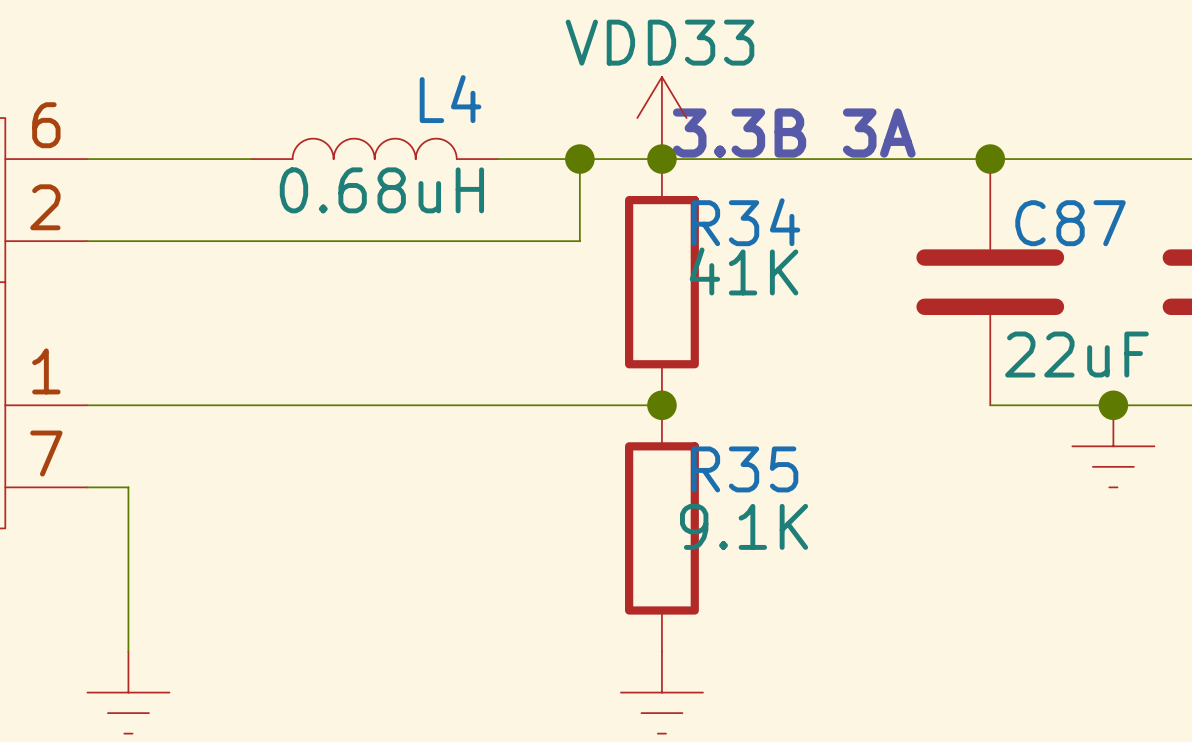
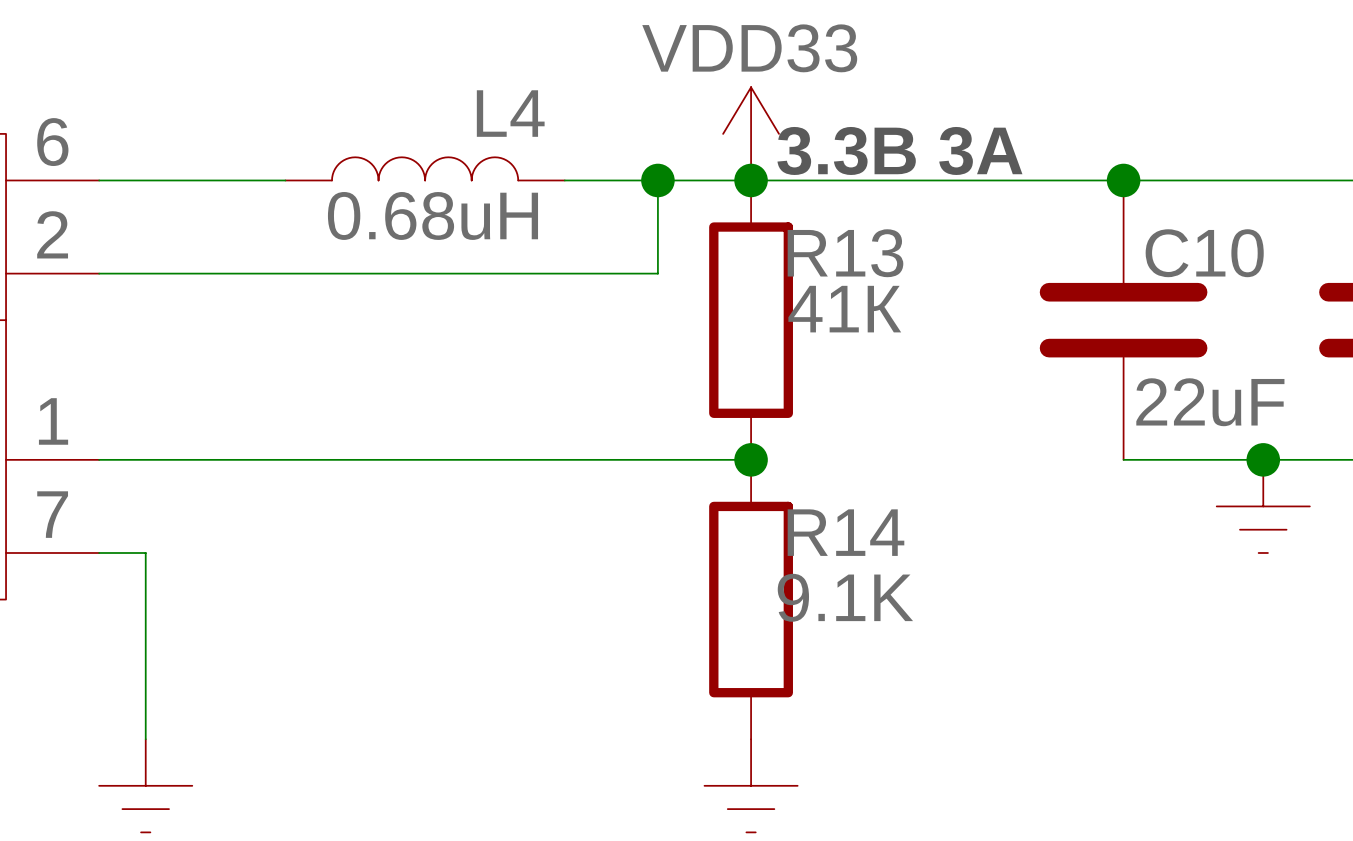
R34 name: R34 (745, 222) -> R13 (845, 253)
C87 name: C87 (1070, 223) -> C10 (1204, 253)
R35 name: R35 (745, 469) -> R14 (845, 532)

